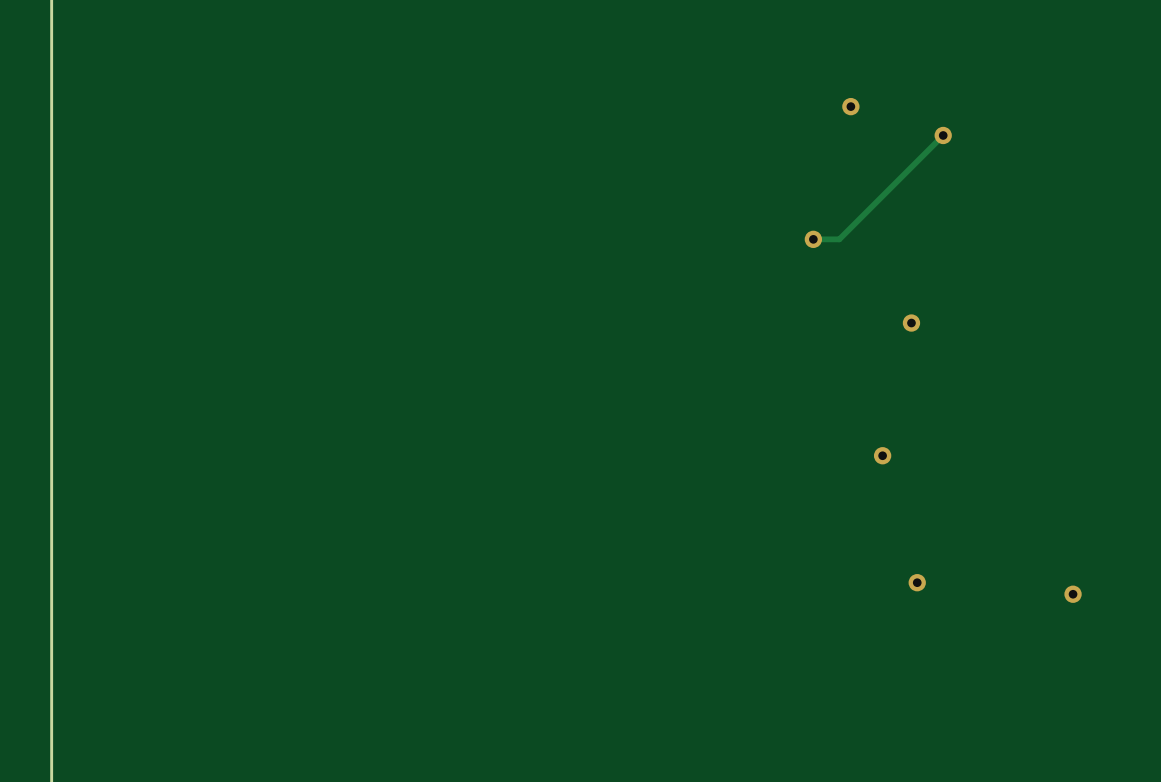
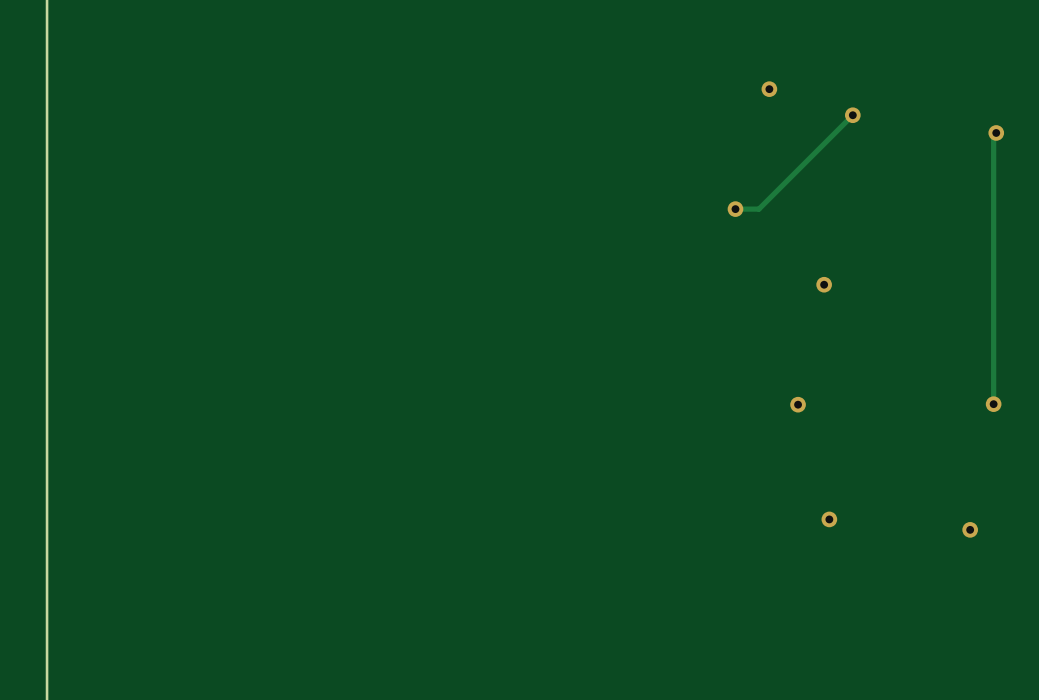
track: none -> (996, 132) (993, 135) (993, 404)
via: none -> (996, 132)
via: none -> (993, 404)

